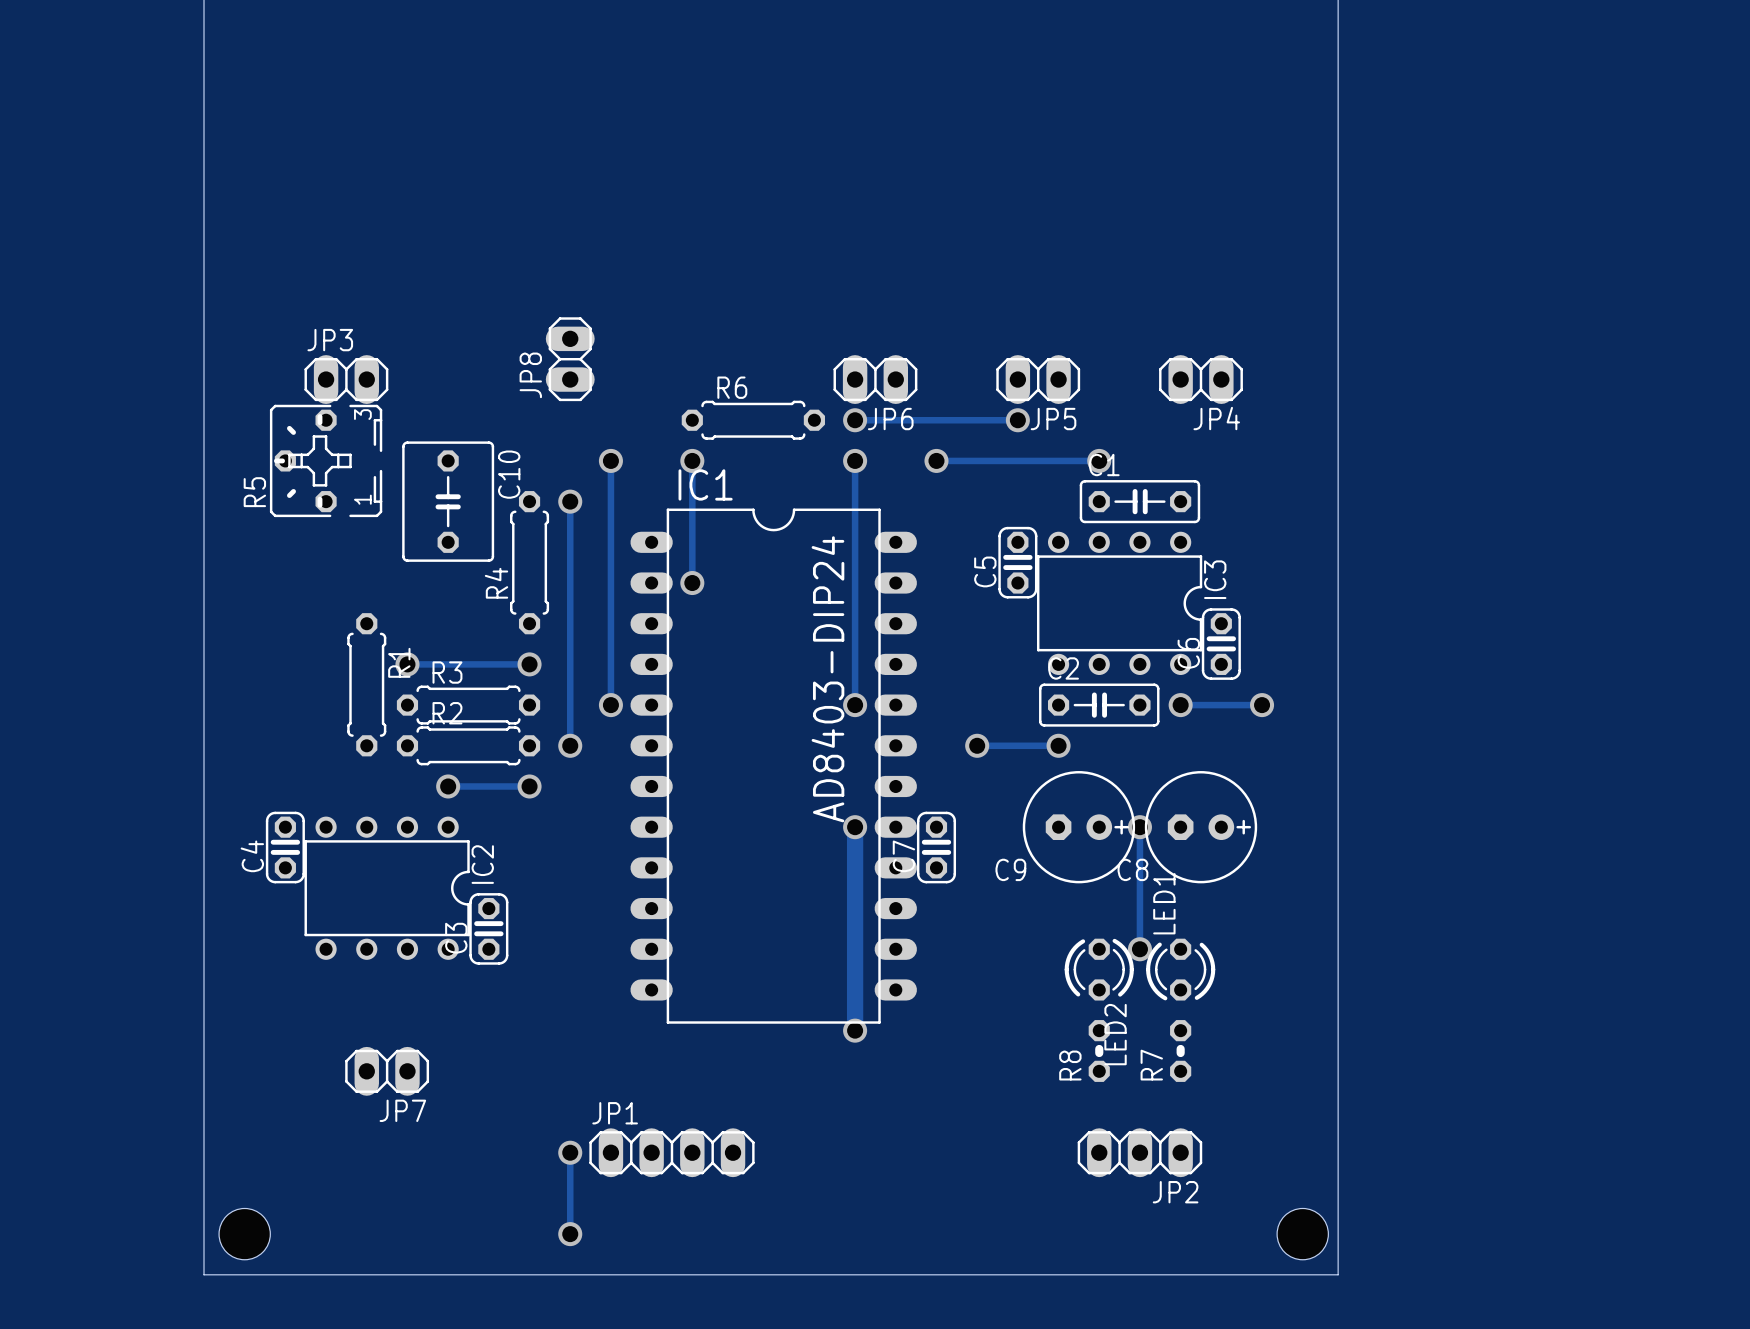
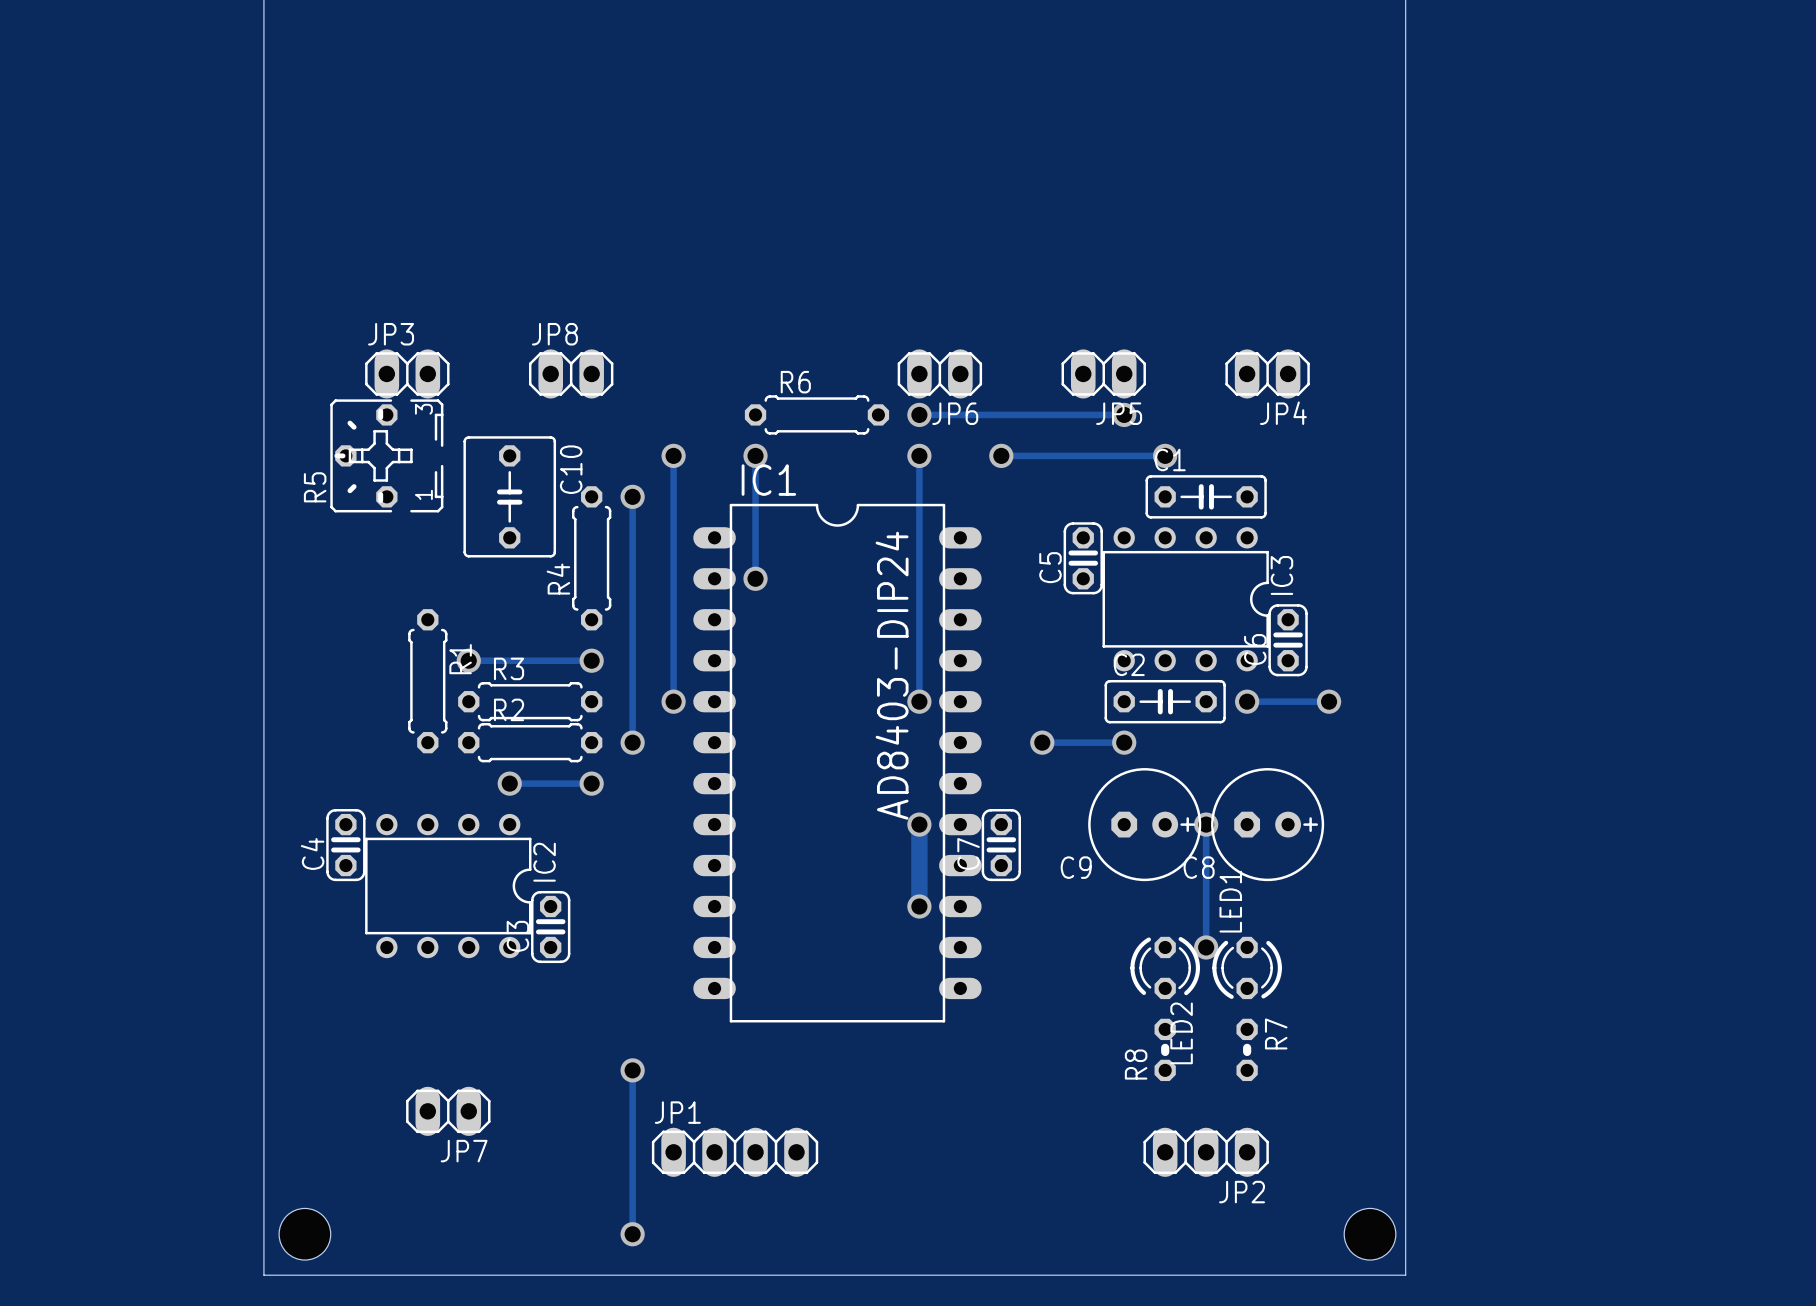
JP8 rotation: 0° (570, 359) -> 90° clockwise (571, 373)
JP8 position: (570, 359) -> (571, 373)
track: none -> (1083, 414) (1124, 414)
via position: (1017, 420) -> (1124, 414)
track: (855, 908) (855, 1030) -> none
via: none -> (919, 906)
via: (855, 1030) -> none
R7 name position: R7 (1151, 1065) -> R7 (1276, 1033)
JP7 position: (387, 1071) -> (448, 1111)
track: none -> (632, 1070) (632, 1152)
via position: (570, 1152) -> (632, 1070)

